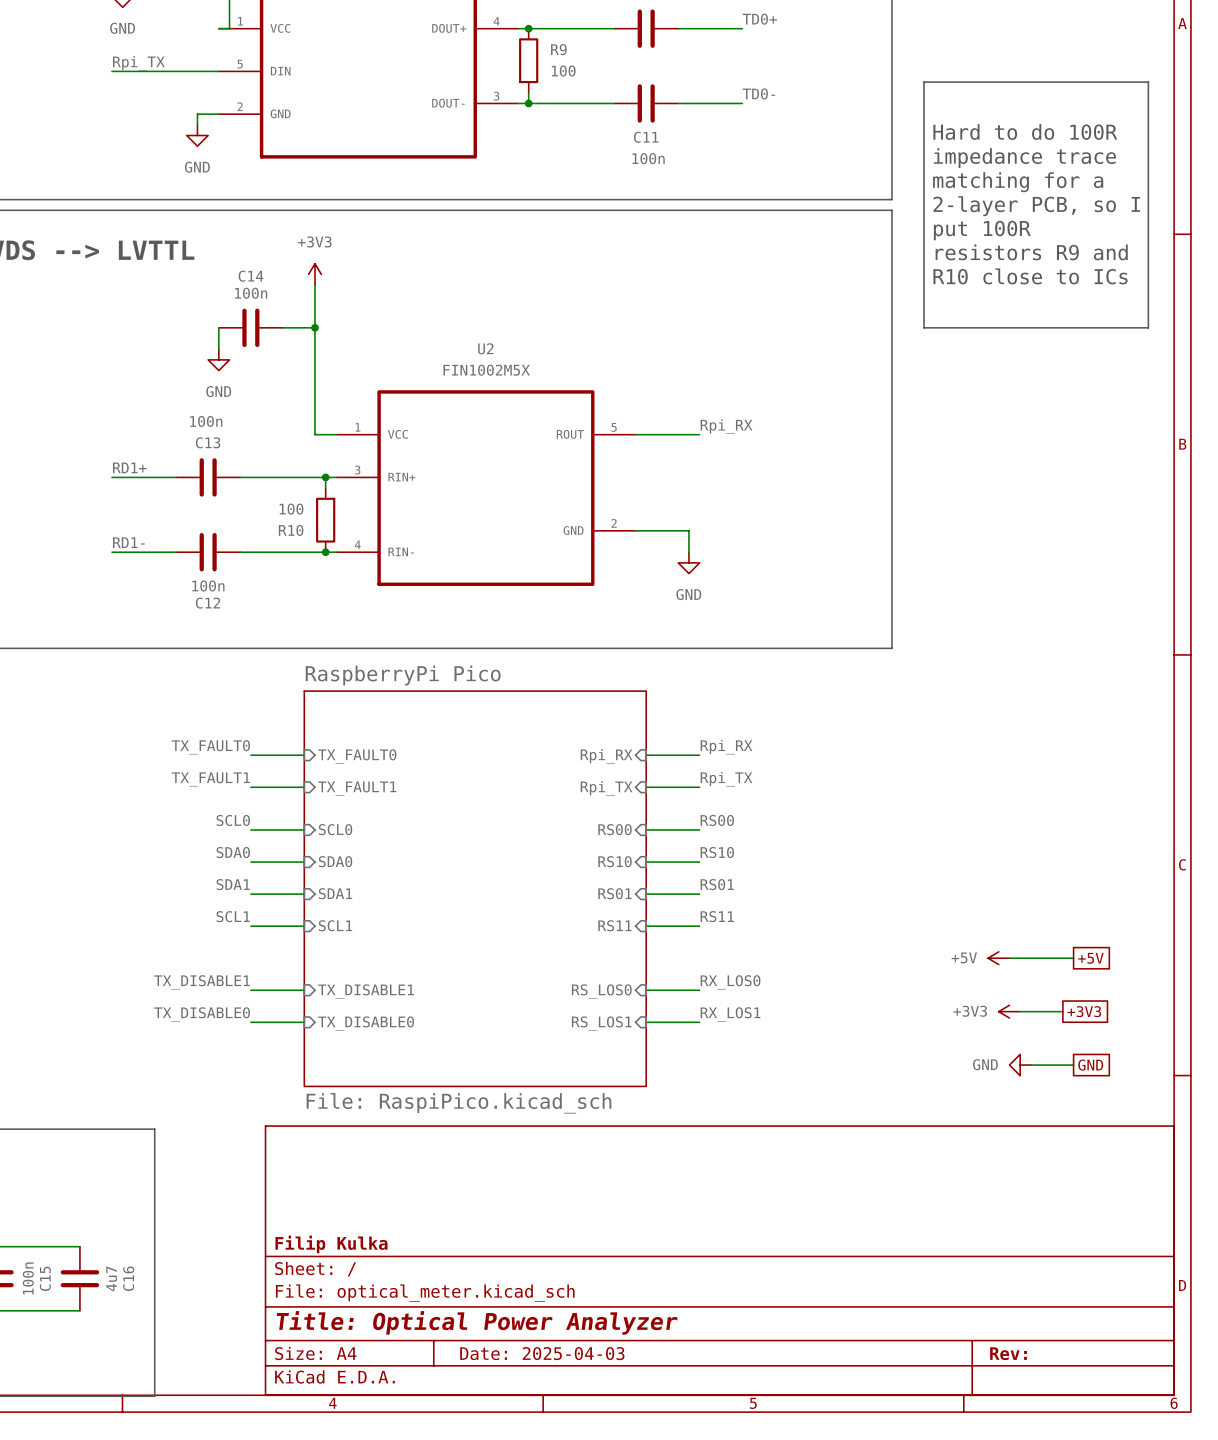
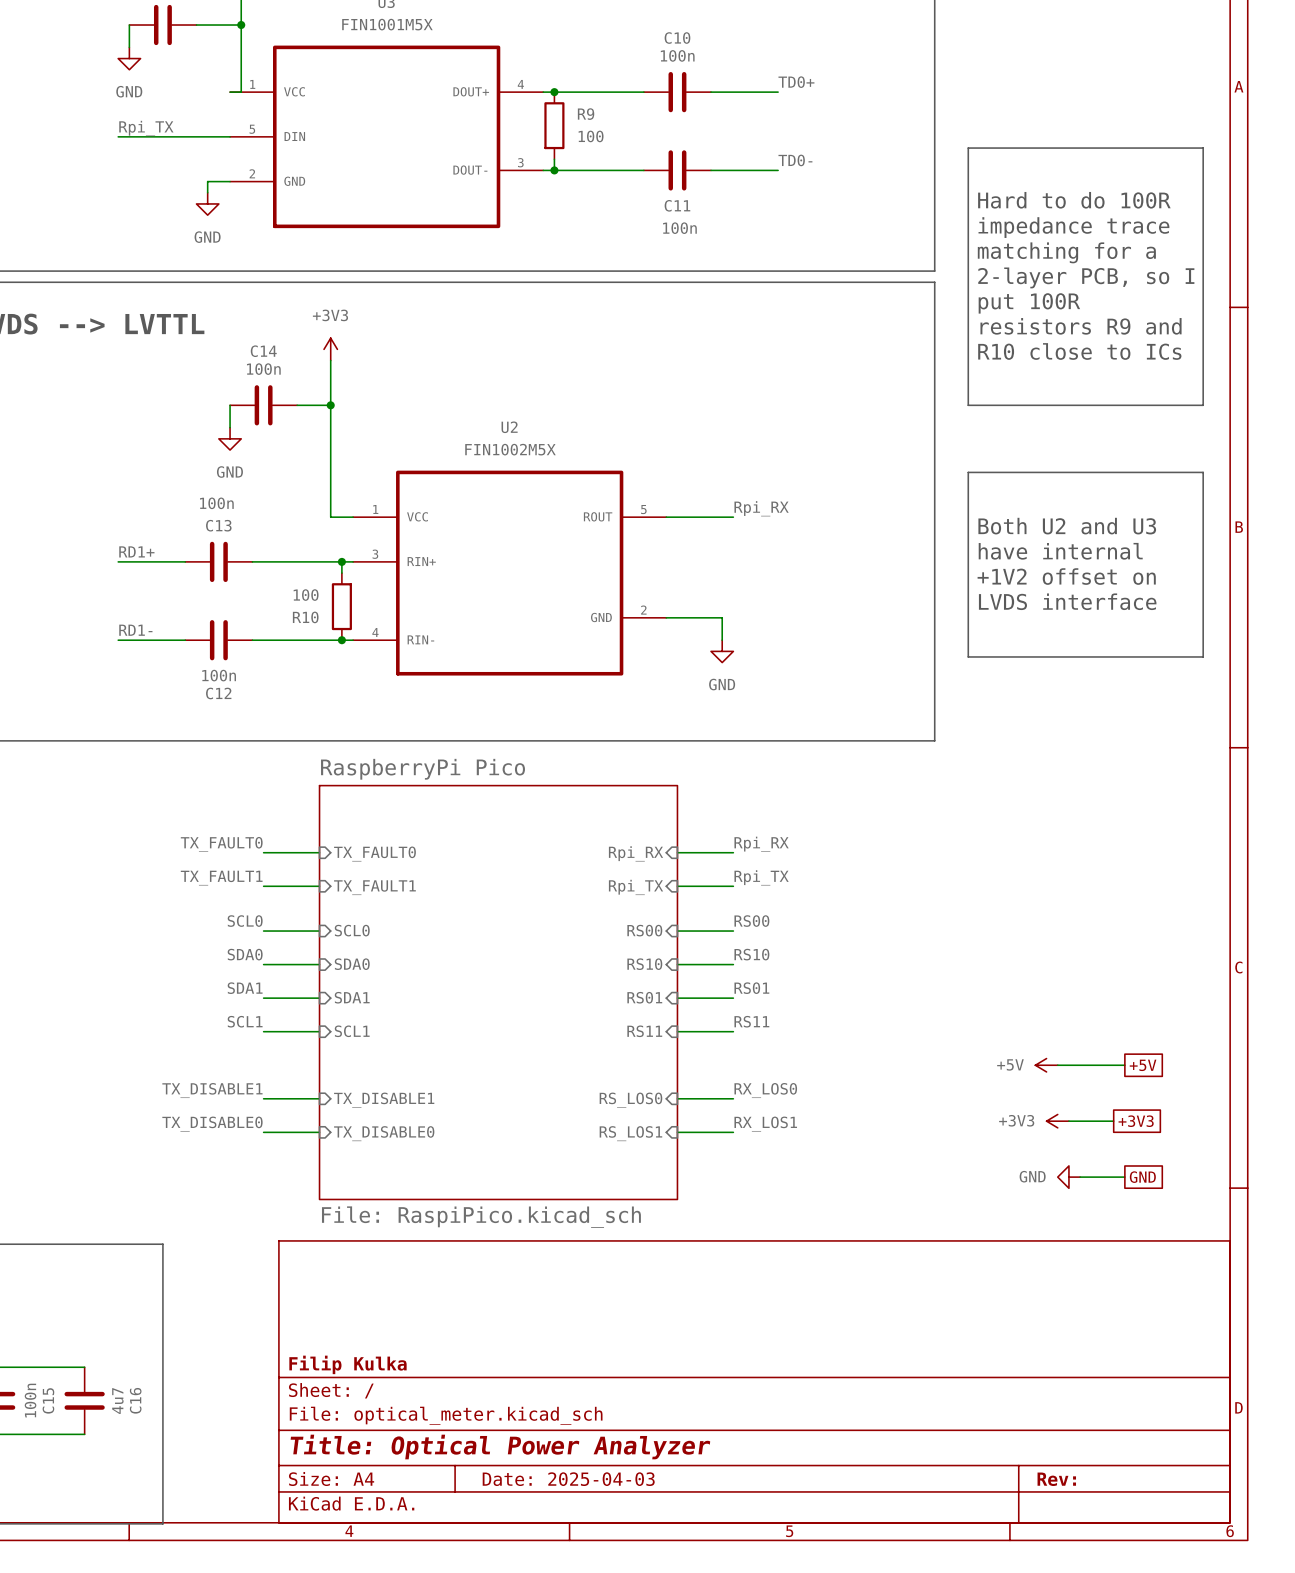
line: none -> (968, 472) (1203, 472) (1203, 656) (968, 656) (968, 472)
text: none -> Both U2 and U3 (1067, 526)
text: none -> have internal (1060, 551)
text: none -> +1V2 offset on (1066, 576)
text: none -> LVDS interface (1067, 601)

